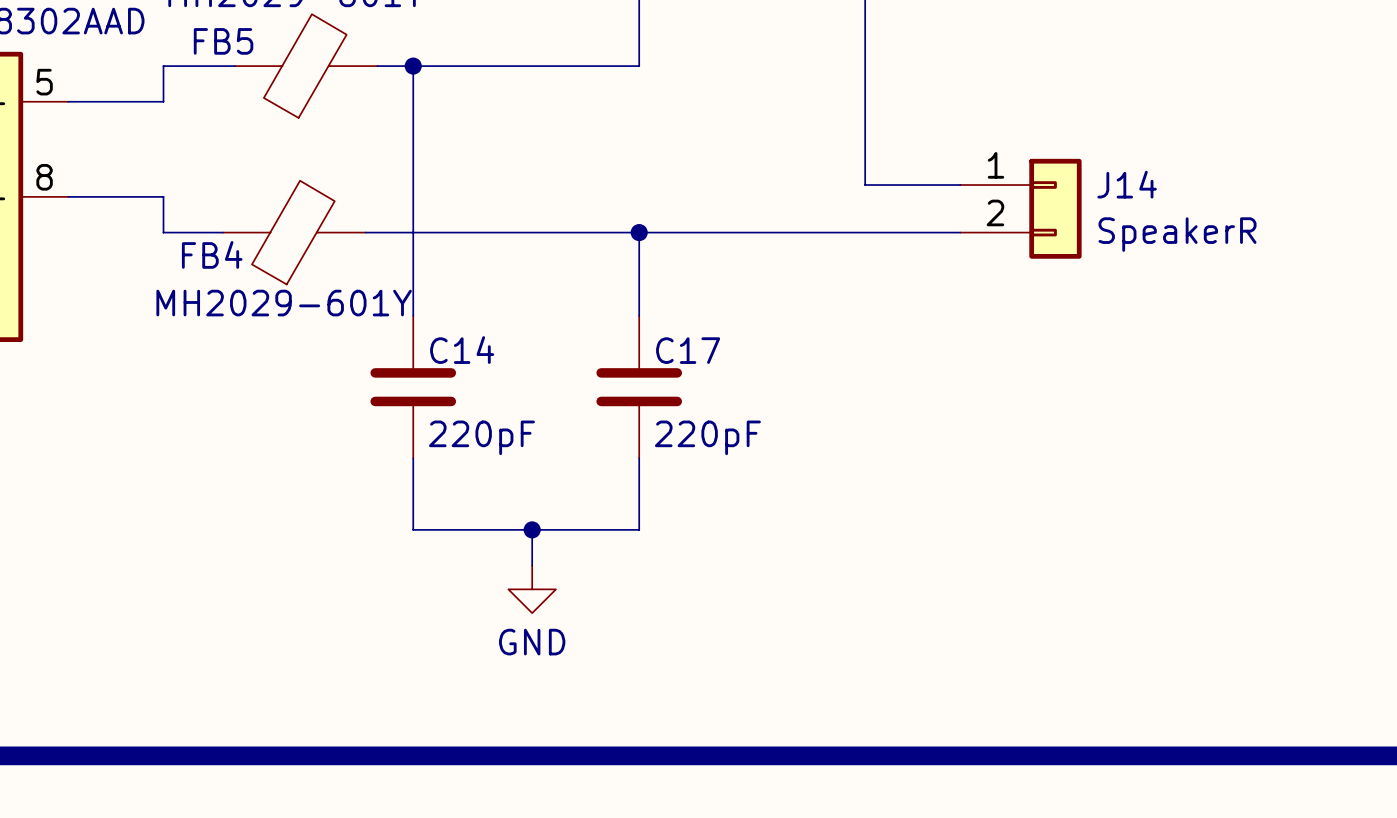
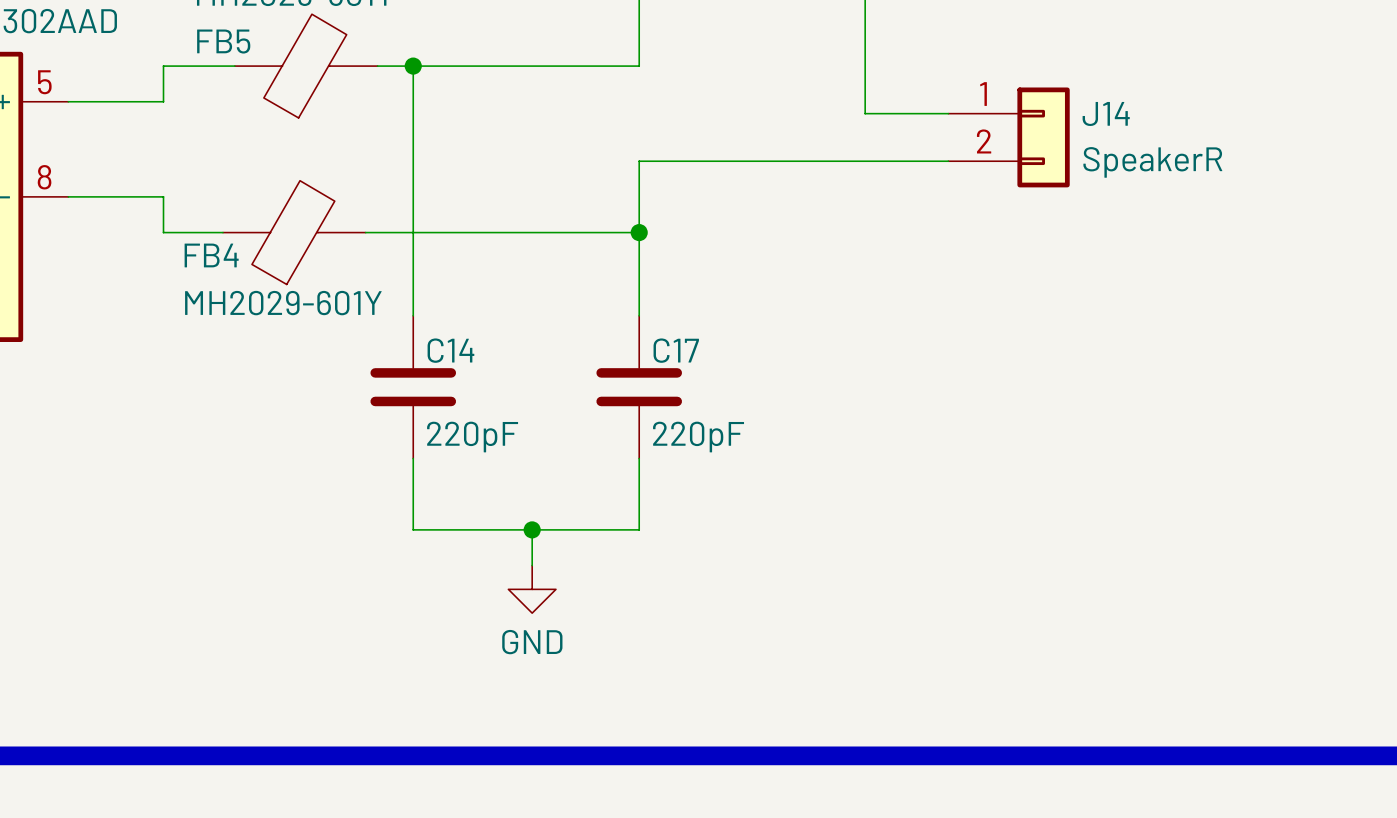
wire: (865, 113) (865, 185) (960, 185) -> (865, 113) (948, 113)
J14 position: (1020, 208) -> (1009, 137)
wire: (639, 232) (960, 232) -> (639, 232) (639, 161) (948, 161)

